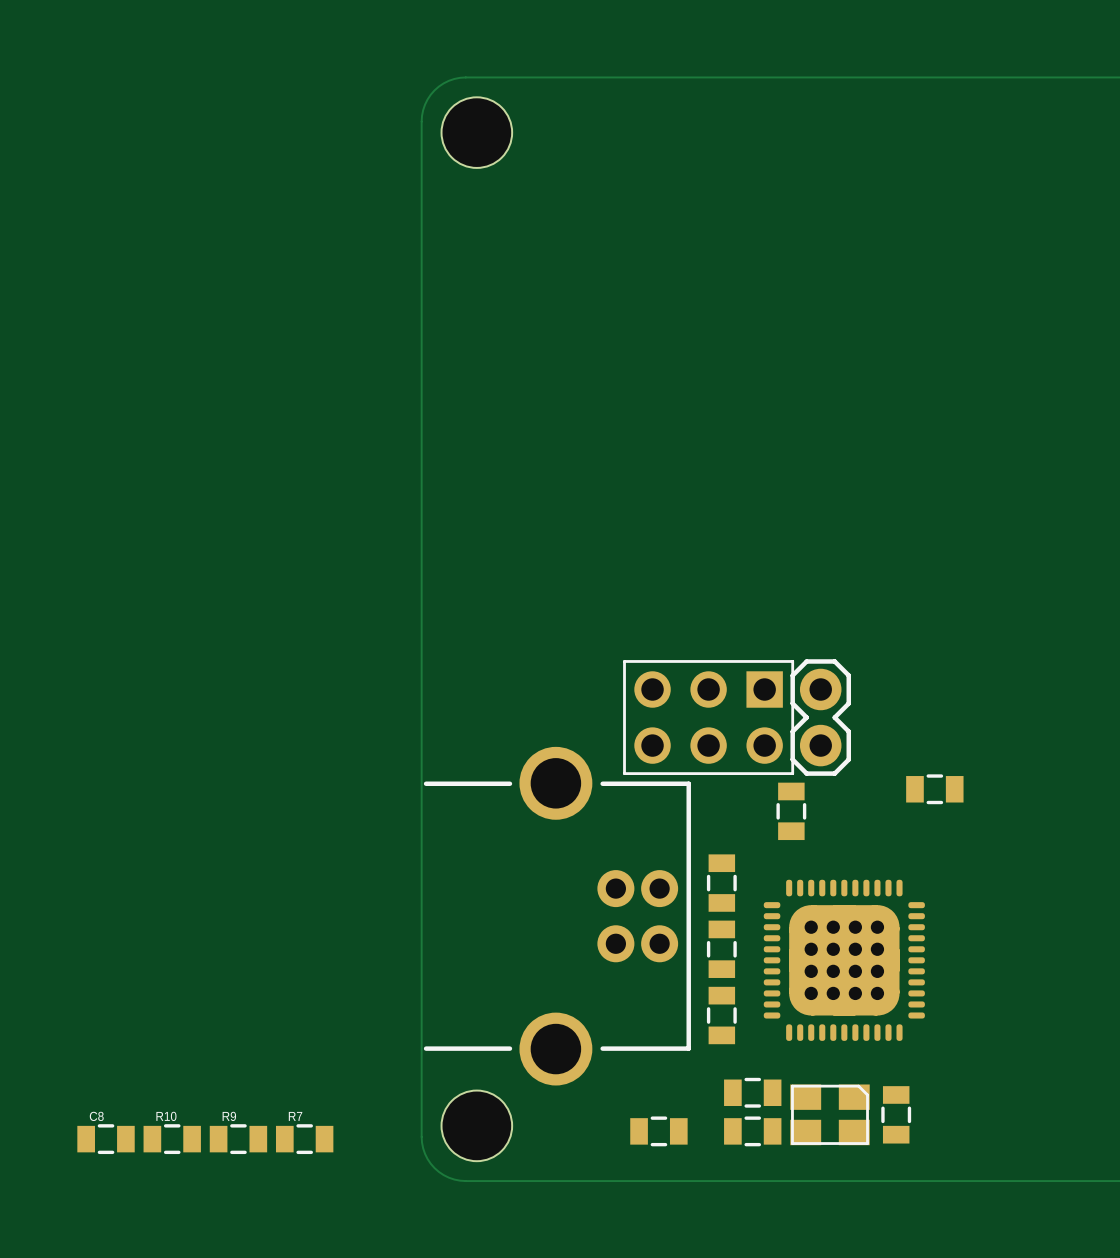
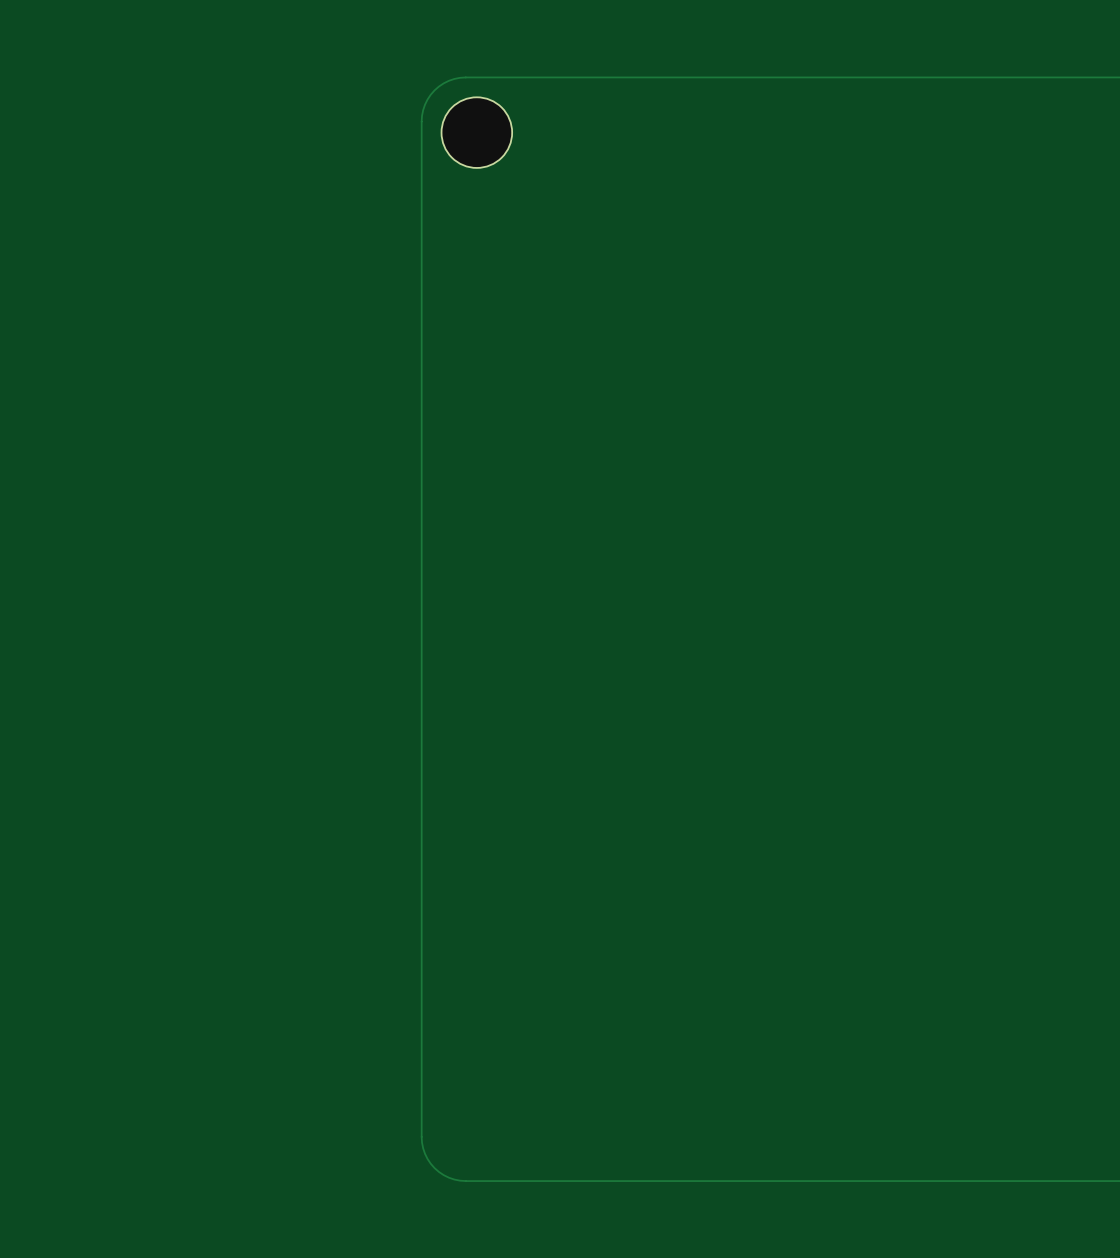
part: (708, 717) -> none
part: (820, 717) -> none
part: (934, 789) -> none
part: (791, 811) -> none
part: (721, 883) -> none
part: (557, 916) -> none
part: (721, 949) -> none
part: (844, 960) -> none
part: (721, 1015) -> none
part: (752, 1092) -> none
part: (829, 1114) -> none
part: (896, 1114) -> none
hole: (476, 1125) -> none
part: (658, 1131) -> none
part: (752, 1131) -> none
C8: (106, 1139) -> none
R10: (172, 1139) -> none
R9: (238, 1139) -> none
R7: (304, 1139) -> none

